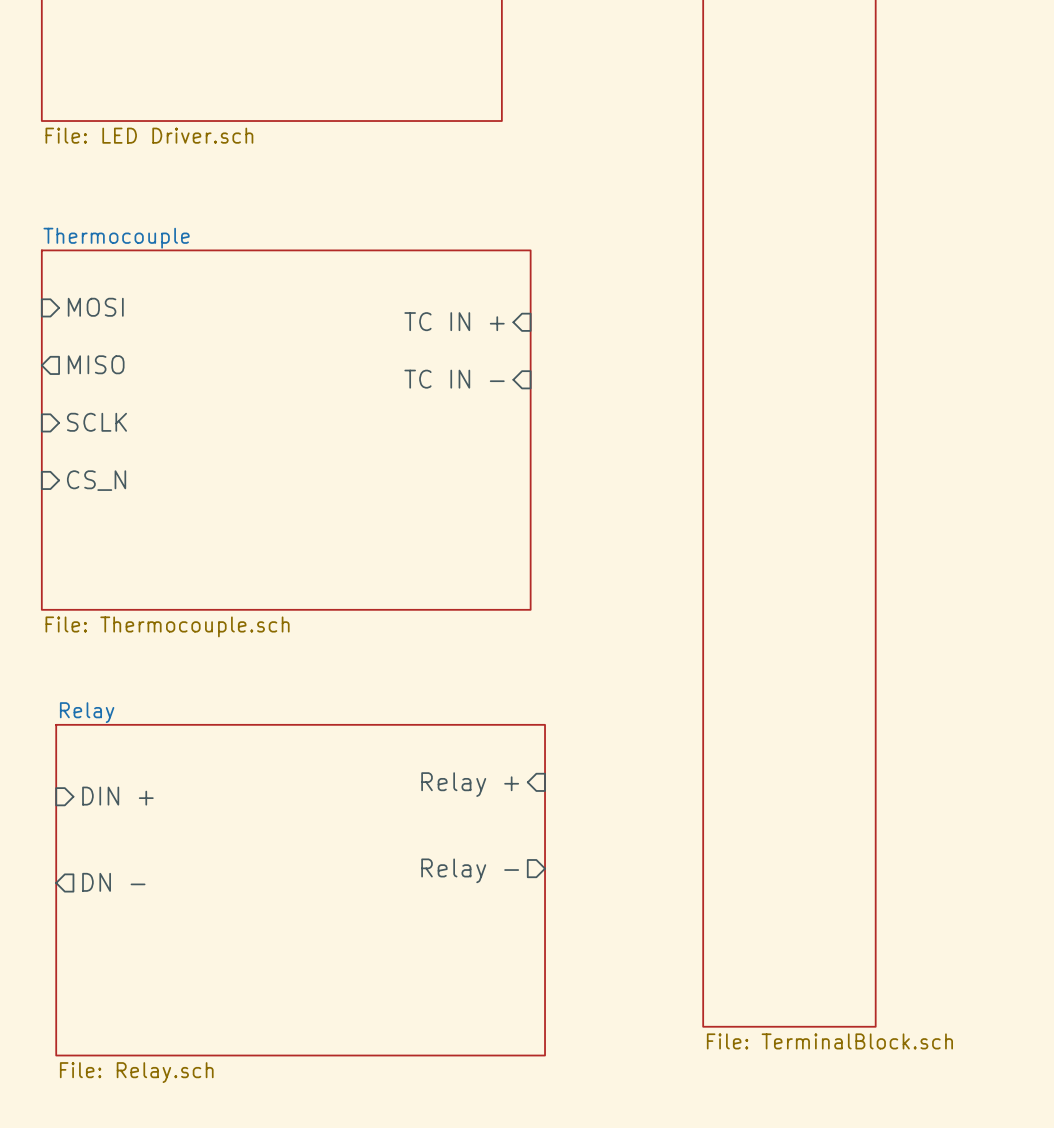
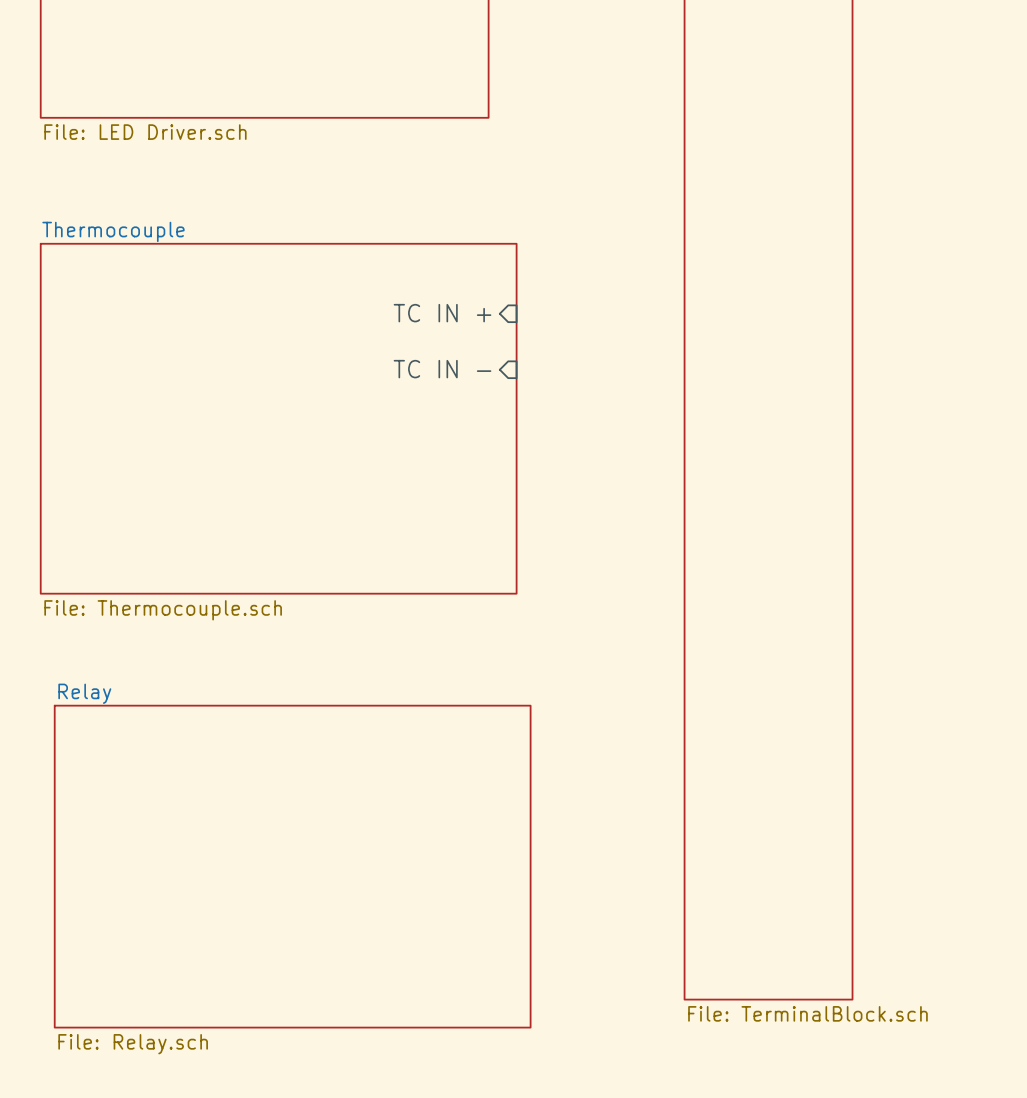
sheet pin: MOSI (95, 307) -> none
sheet pin: MISO (96, 364) -> none
sheet pin: SCLK (96, 422) -> none
sheet pin: CS_N (96, 480) -> none
sheet pin: Relay + (470, 784) -> none
sheet pin: DIN + (117, 796) -> none
sheet pin: Relay - (470, 870) -> none
sheet pin: DN - (113, 882) -> none

